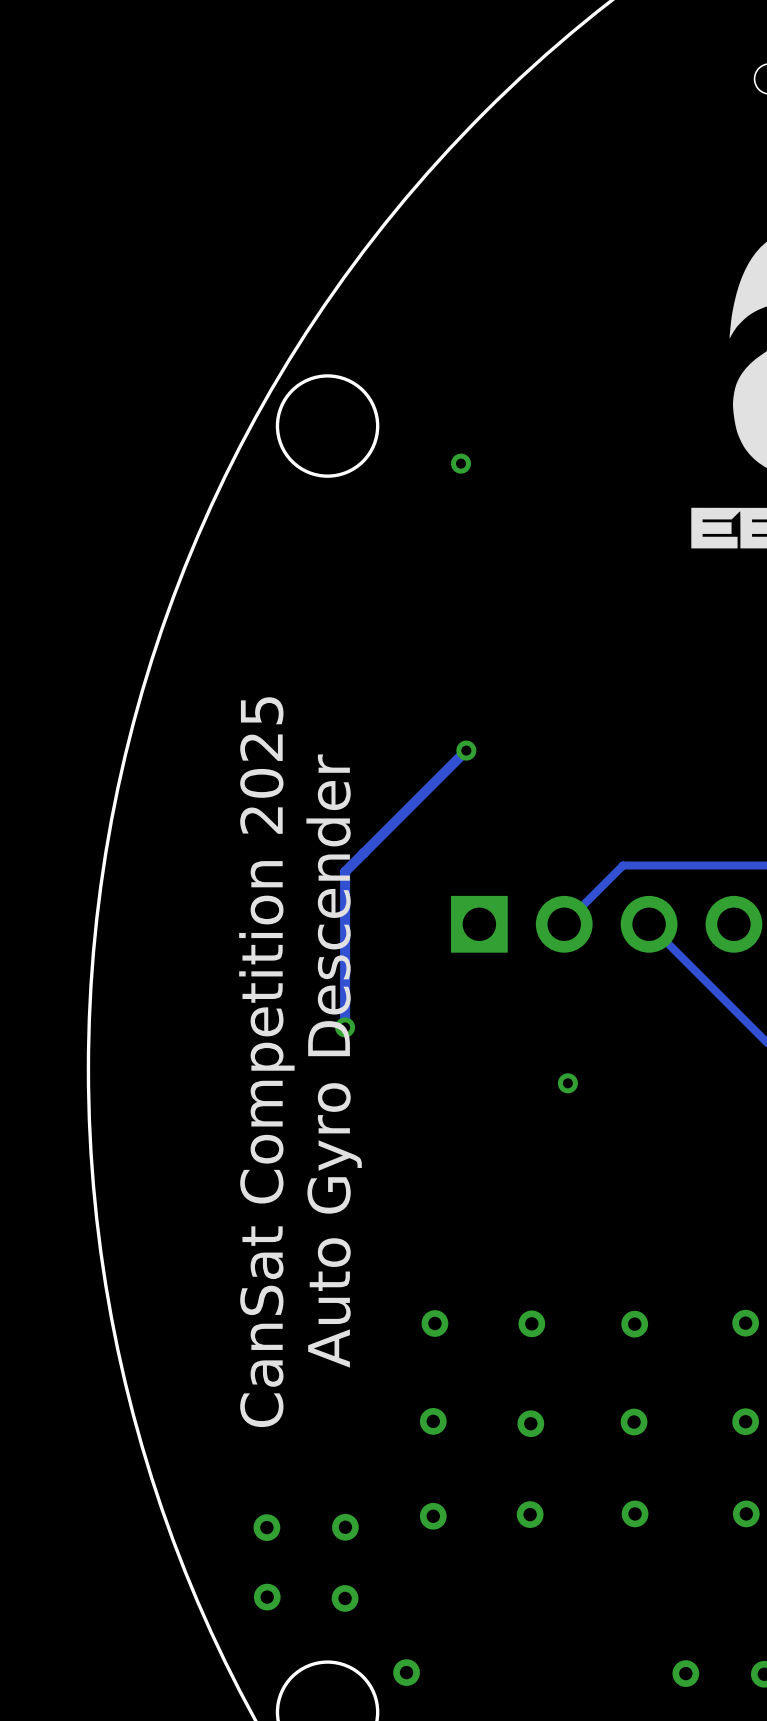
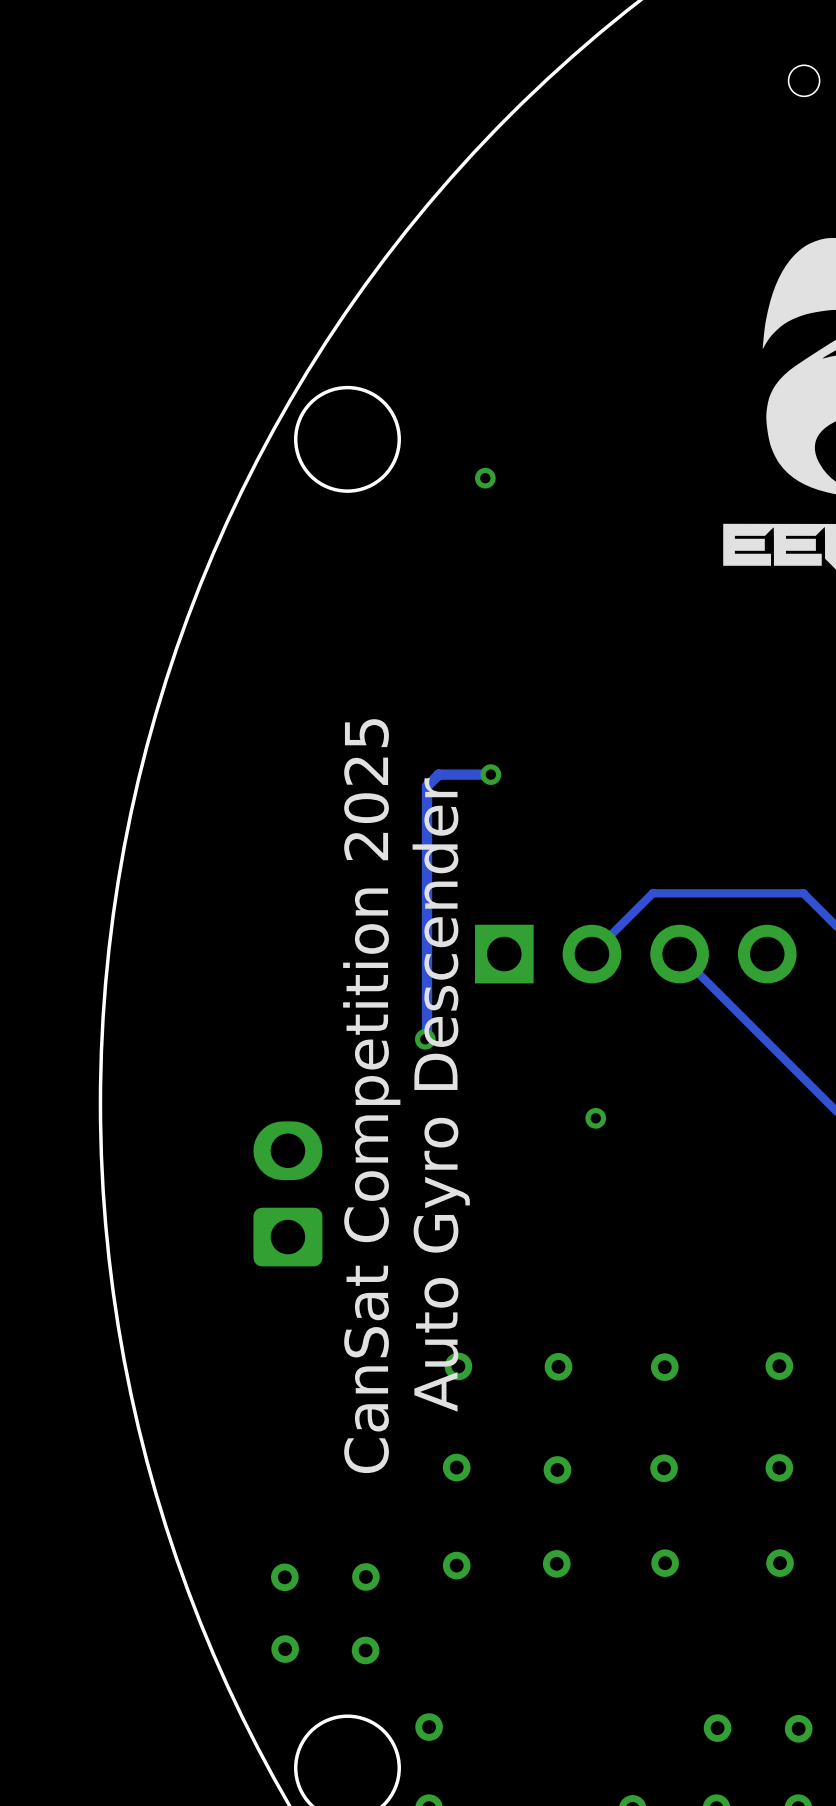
track: (466, 750) (345, 871) (345, 1027) -> (490, 774) (438, 774) (427, 786) (427, 1037) (425, 1039)
via position: (345, 1027) -> (425, 1039)
text position: Auto Gyro Descender (334, 1061) -> Auto Gyro Descender (441, 1094)
text position: CanSat Competition 2025 (266, 1062) -> CanSat Competition 2025 (371, 1096)
part: none -> (287, 1193)

